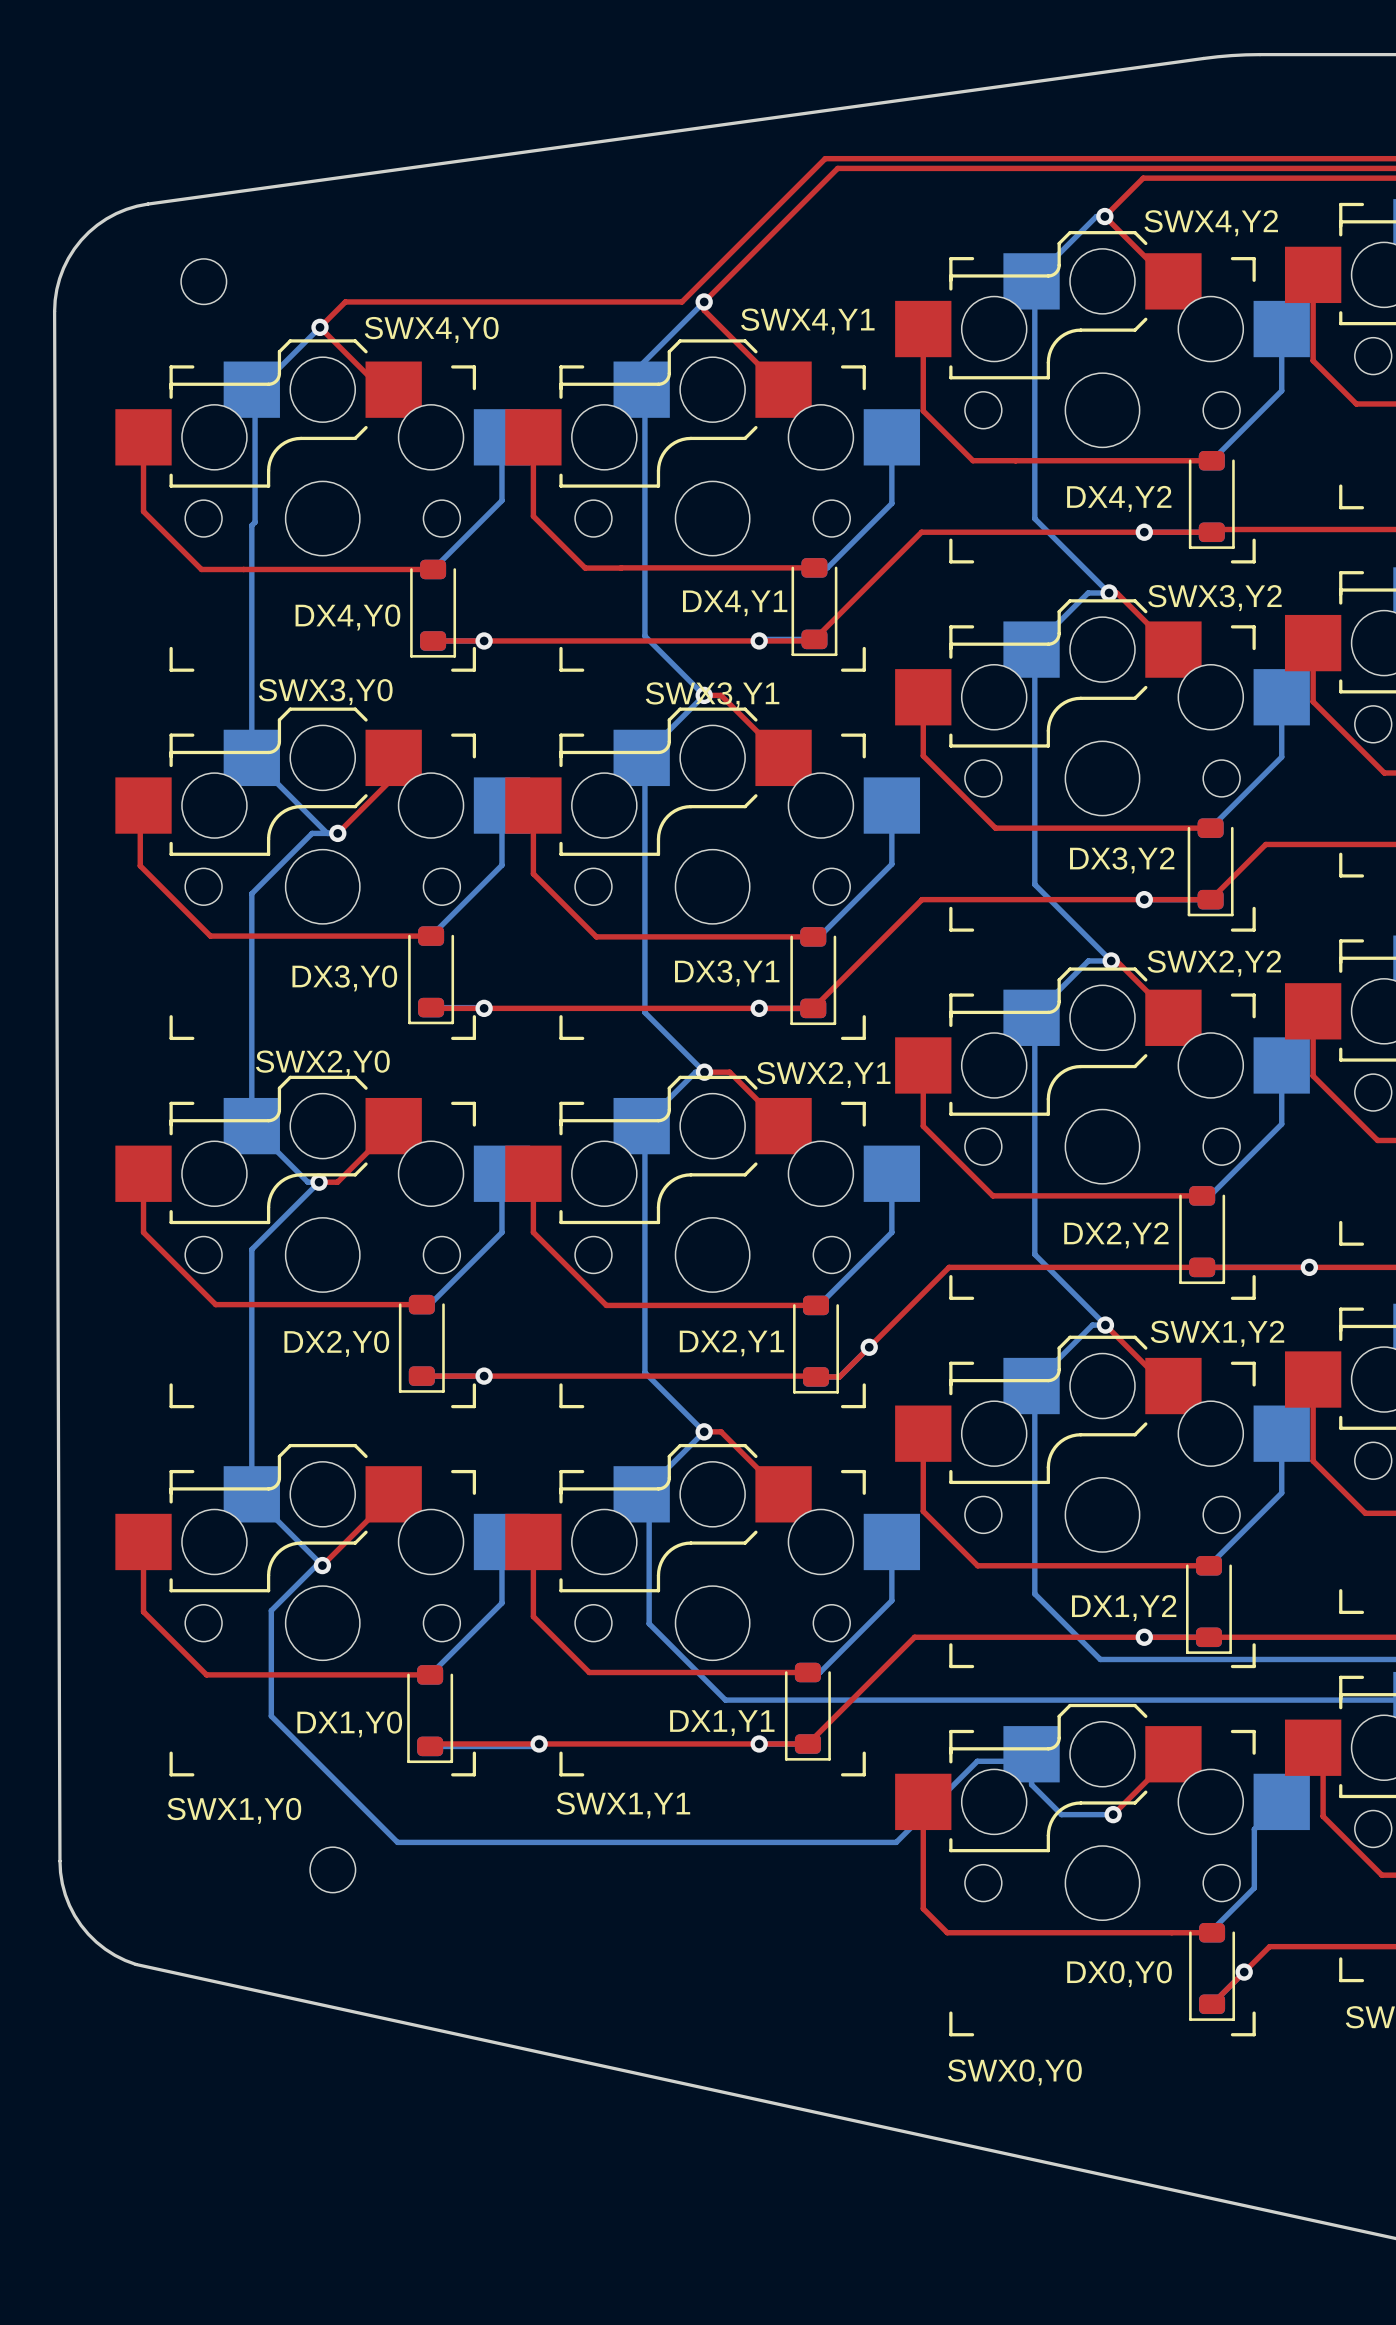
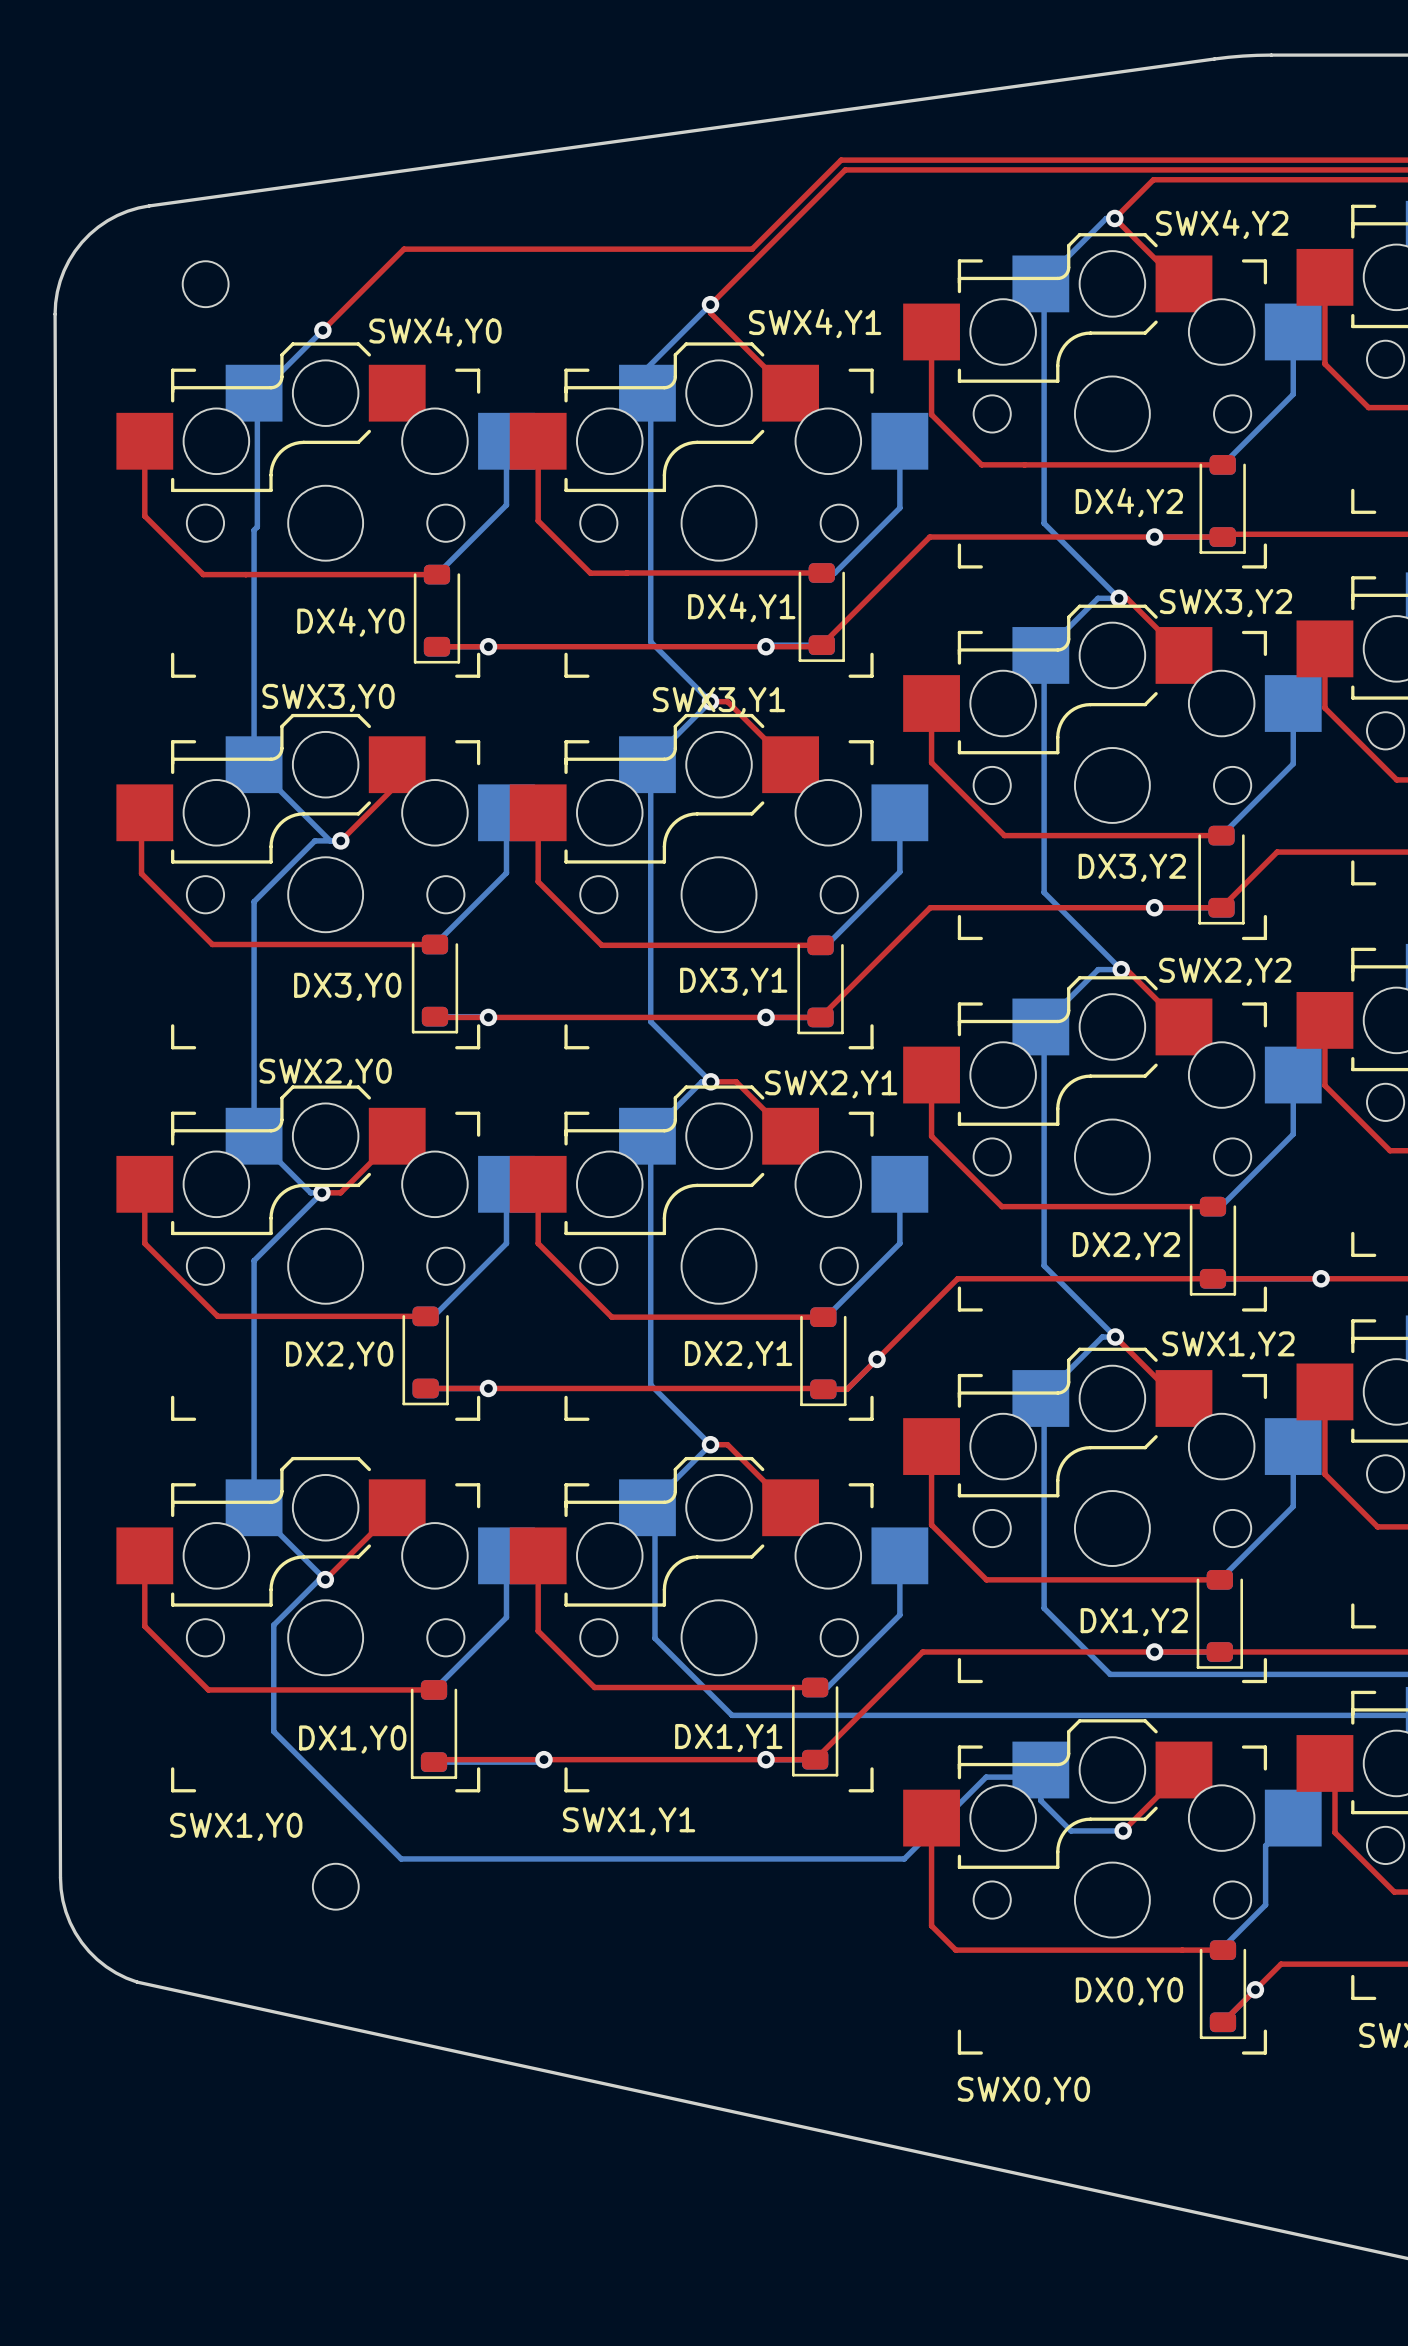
top track: (833, 158) (825, 158) (681, 301) (345, 301) -> (841, 160) (752, 249) (404, 249) (348, 304)
top track: (320, 327) (382, 389) (393, 389) -> none

